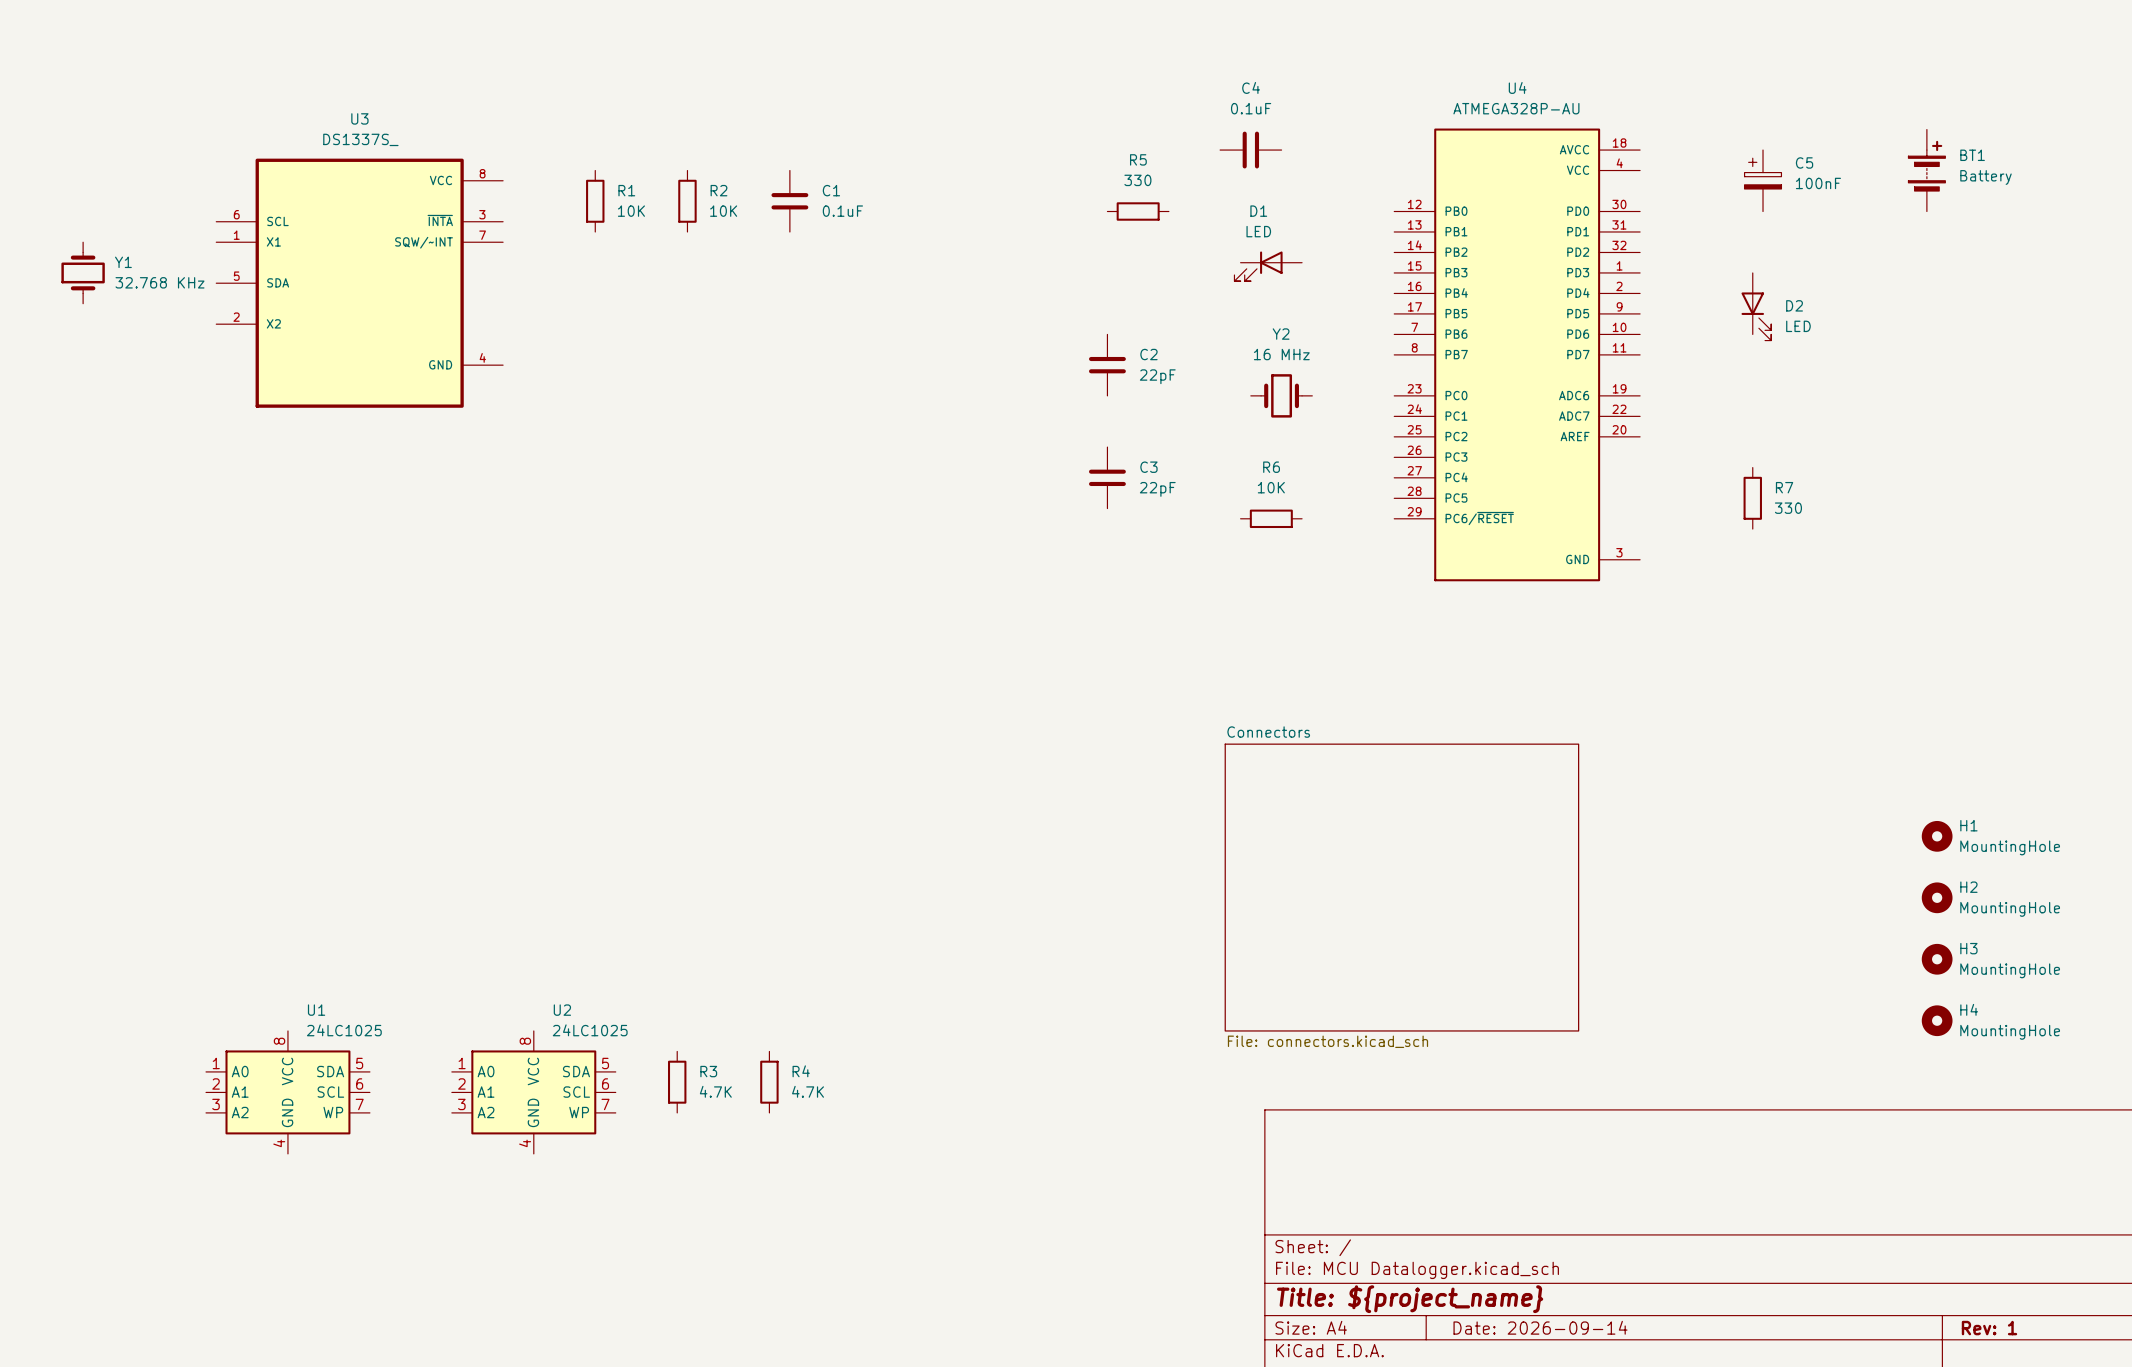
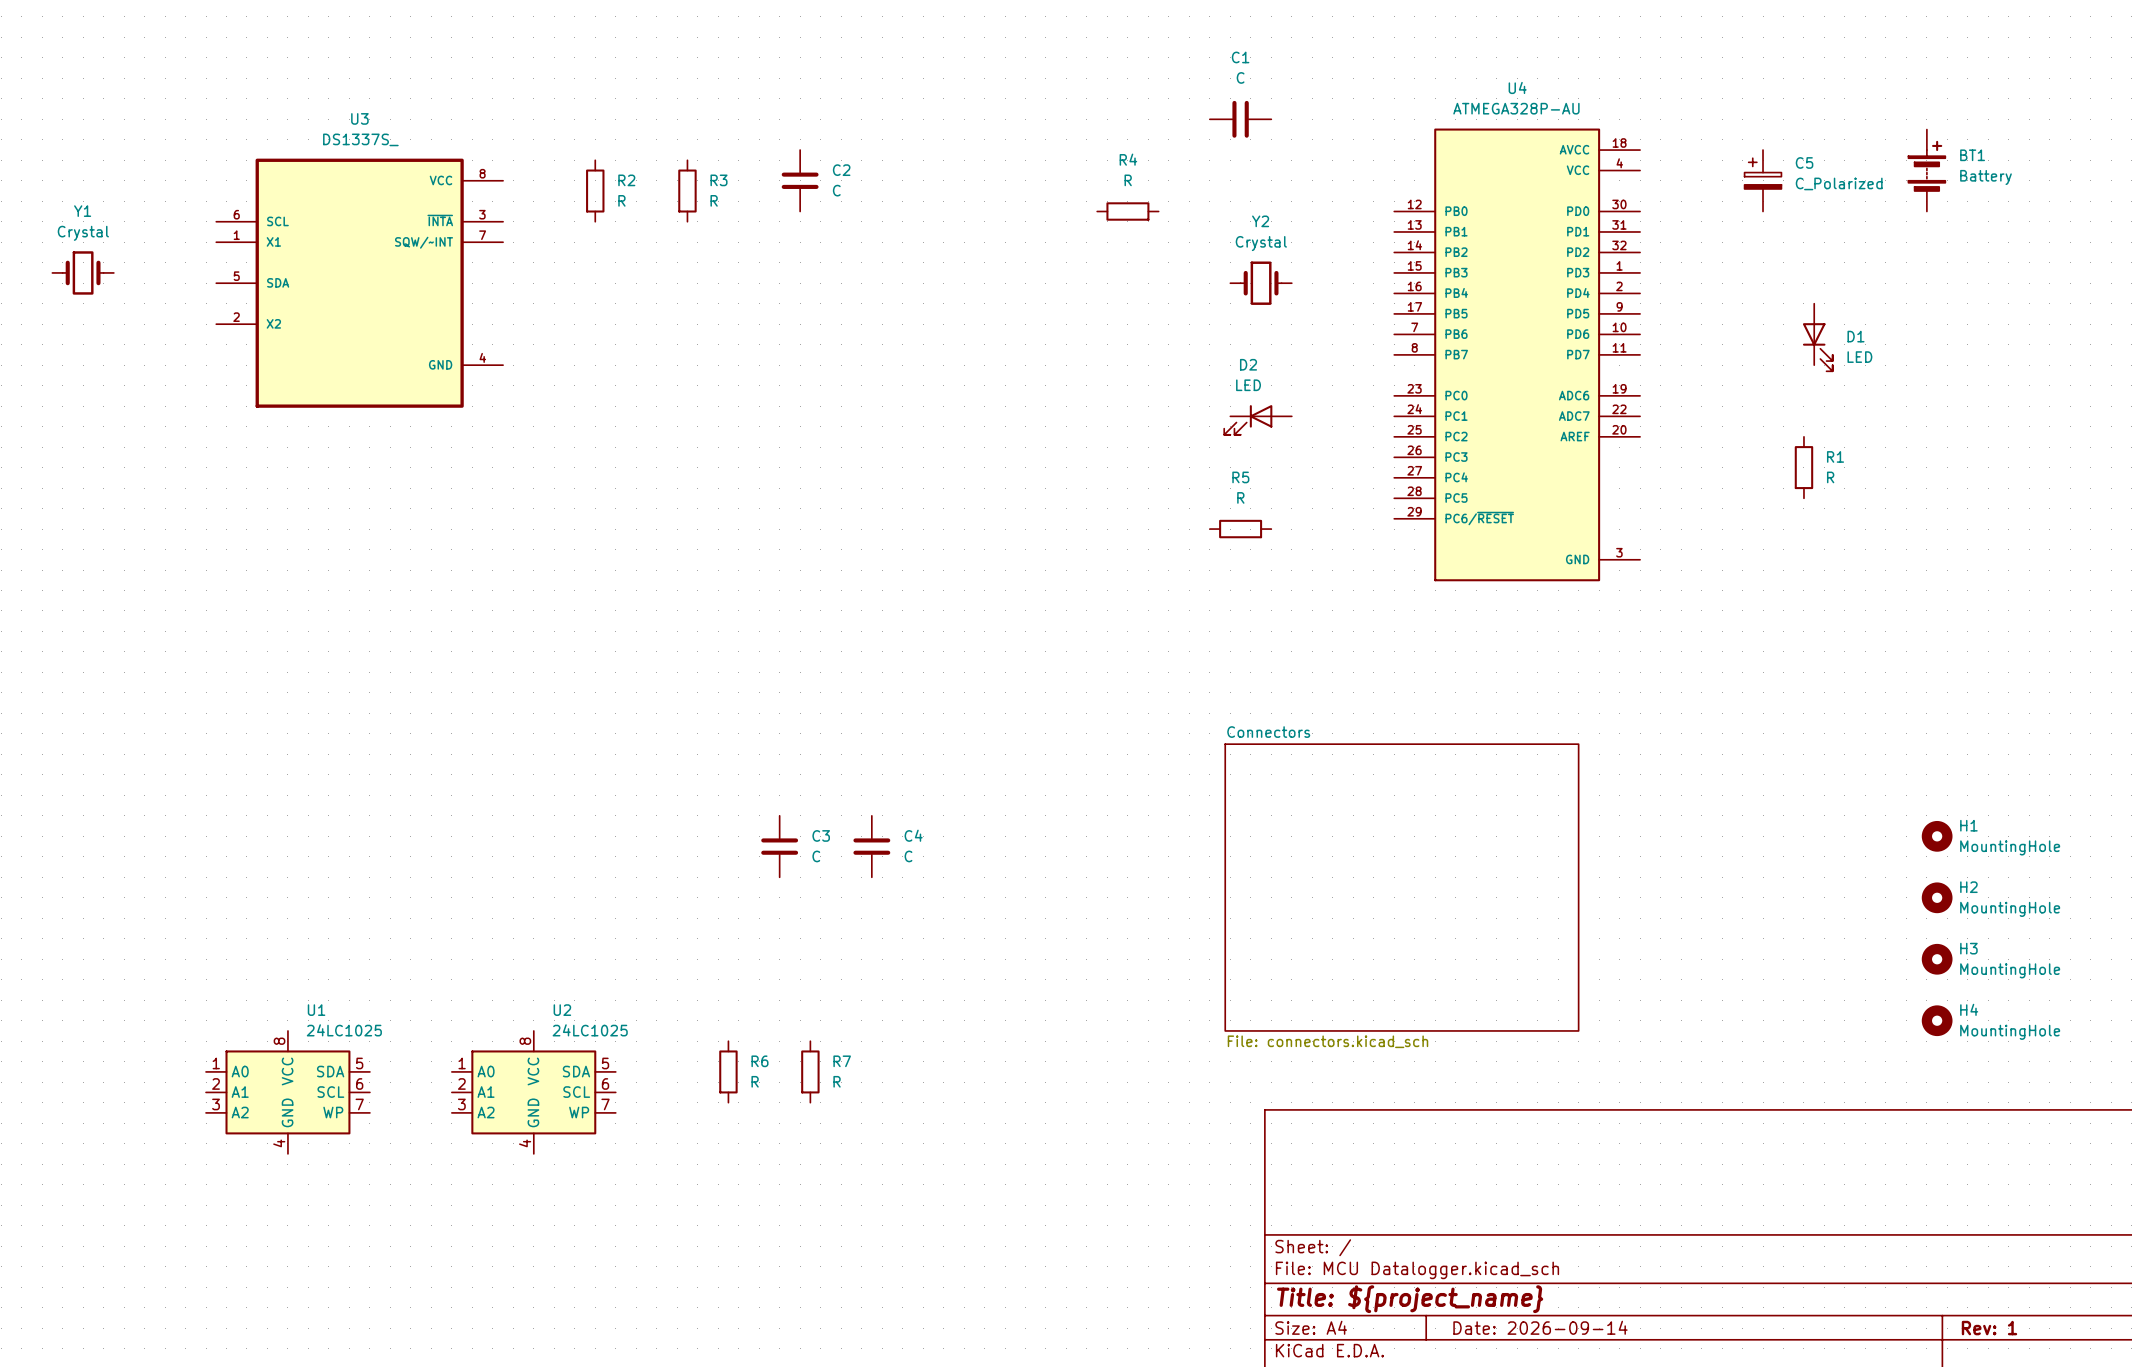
C4 name position: C4 (1251, 87) -> C4 (913, 835)
C4 value: 0.1uF (1251, 108) -> C (908, 856)
C4 rotation: 0° (1250, 150) -> 90° clockwise (871, 846)
C4 position: (1250, 150) -> (871, 846)
R5 value: 330 (1137, 180) -> R (1240, 497)
C5 value: 100nF (1818, 183) -> C_Polarized (1839, 183)
C1 name position: C1 (831, 190) -> C1 (1240, 57)
R1 position: (595, 201) -> (1803, 467)
R2 position: (687, 201) -> (595, 191)
C1 rotation: 0° (789, 201) -> 90° clockwise (1240, 119)
C1 position: (789, 201) -> (1240, 119)
R1 value: 10K (631, 211) -> R (1830, 477)
R2 value: 10K (723, 211) -> R (621, 200)
C1 value: 0.1uF (842, 211) -> C (1240, 77)
R5 position: (1138, 211) -> (1240, 529)
D1 name position: D1 (1258, 211) -> D1 (1856, 336)
D1 value position: LED (1258, 231) -> LED (1859, 357)
Y1 name position: Y1 (123, 262) -> Y1 (82, 211)
D1 rotation: 0° (1258, 266) -> 90° counterclockwise (1817, 347)
D1 position: (1268, 266) -> (1817, 337)
Y1 rotation: 0° (83, 272) -> 90° clockwise (83, 272)
Y1 value: 32.768 KHz (160, 282) -> Crystal (83, 233)
D2 name position: D2 (1794, 305) -> D2 (1248, 364)
D2 position: (1756, 306) -> (1258, 419)
D2 rotation: 0° (1756, 316) -> 90° clockwise (1248, 419)
D2 value position: LED (1798, 326) -> LED (1248, 385)
Y2 value: 16 MHz (1281, 354) -> Crystal (1261, 243)
C2 position: (1107, 365) -> (800, 180)
C2 value: 22pF (1157, 376) -> C (836, 190)
Y2 position: (1281, 395) -> (1261, 283)
R6 name position: R6 (1271, 467) -> R6 (759, 1061)
C3 position: (1107, 477) -> (779, 846)
R6 value: 10K (1271, 487) -> R (755, 1081)
C3 value: 22pF (1157, 489) -> C (816, 856)
R7 position: (1752, 498) -> (810, 1071)
R7 value: 330 (1788, 508) -> R (837, 1081)
R6 rotation: 0° (1271, 518) -> 90° clockwise (728, 1071)
R6 position: (1271, 518) -> (728, 1071)
R4 name position: R4 (801, 1071) -> R4 (1128, 159)
R3 position: (677, 1082) -> (687, 191)
R4 rotation: 0° (769, 1082) -> 90° clockwise (1127, 211)
R4 position: (769, 1082) -> (1127, 211)
R3 value: 4.7K (715, 1091) -> R (714, 200)
R4 value: 4.7K (808, 1091) -> R (1128, 180)

